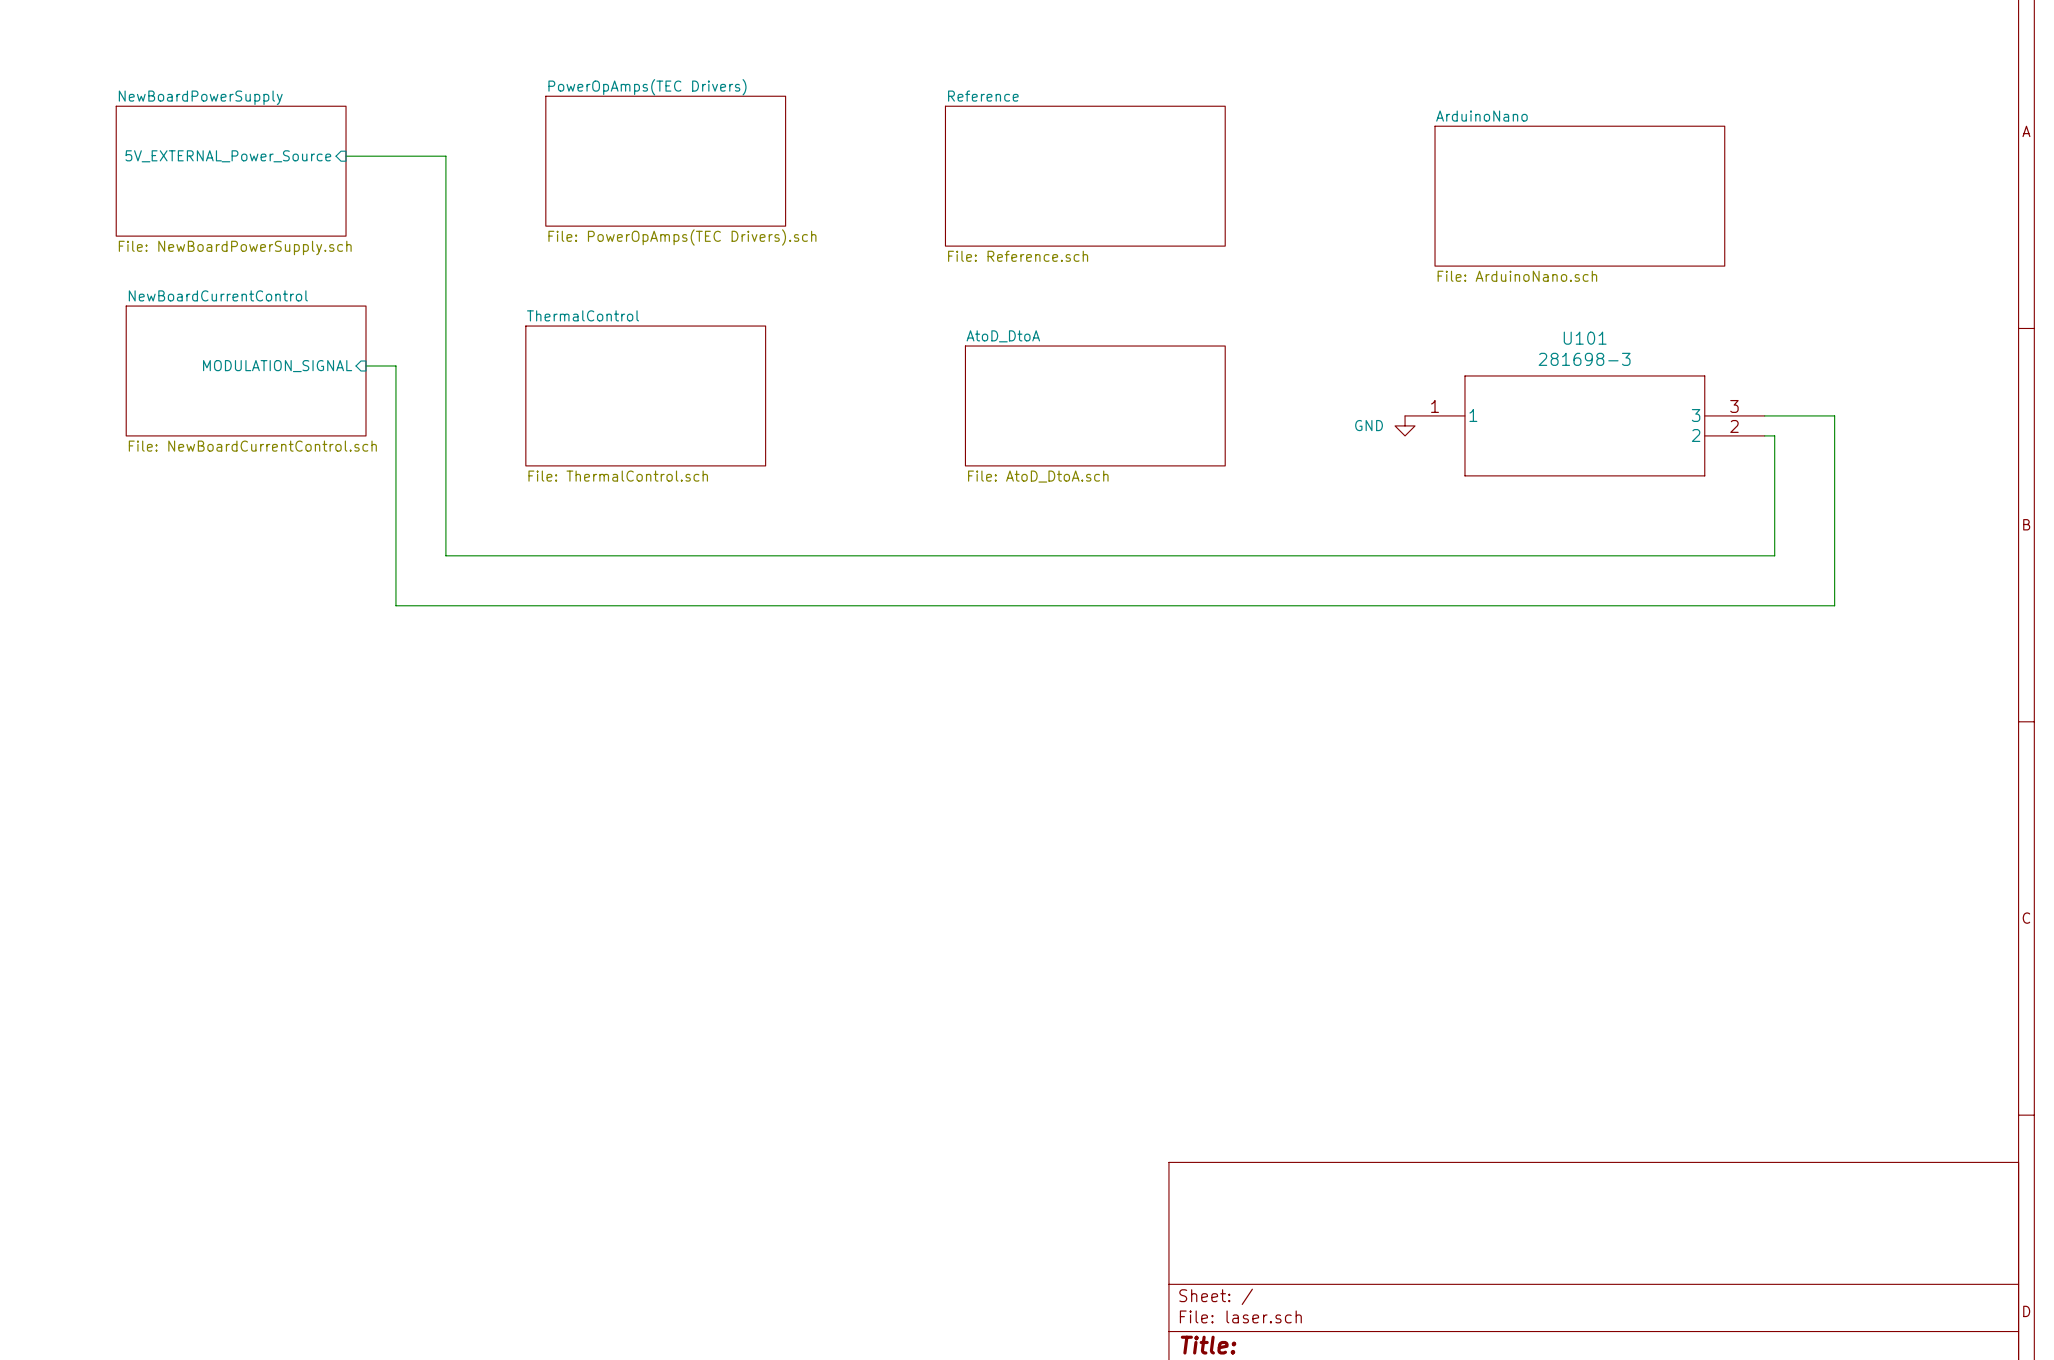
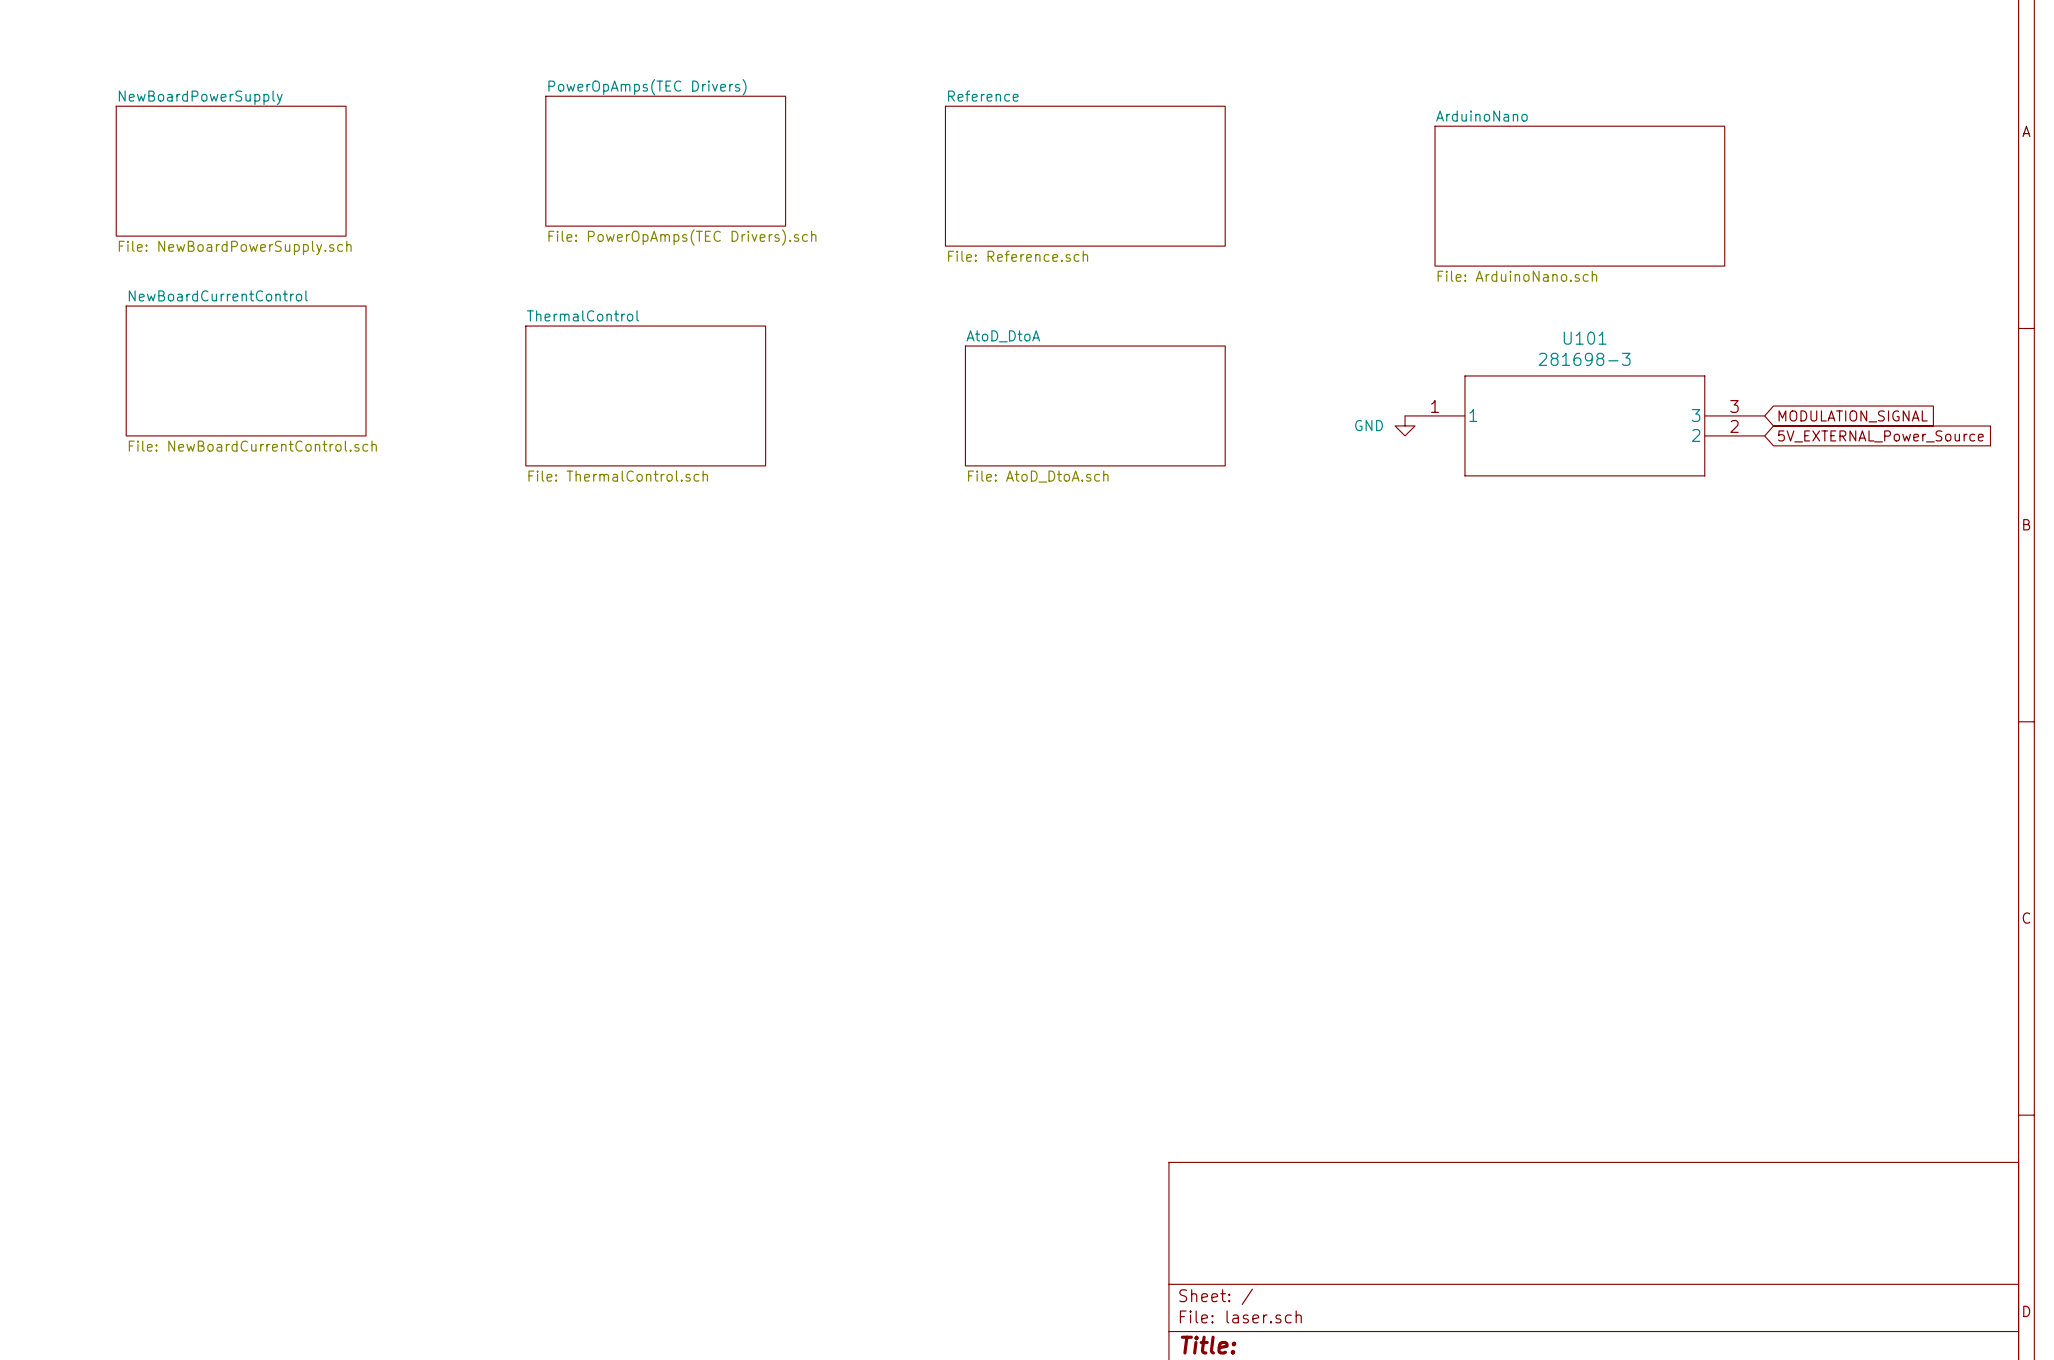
sheet pin: 5V_EXTERNAL_Power_Source (228, 156) -> none
wire: (346, 156) (445, 156) (445, 555) (1774, 555) (1774, 435) (1764, 435) -> none
wire: (365, 365) (395, 365) (395, 605) (1834, 605) (1834, 415) (1764, 415) -> none
sheet pin: MODULATION_SIGNAL (277, 366) -> none
global label: none -> MODULATION_SIGNAL (1853, 416)
global label: none -> 5V_EXTERNAL_Power_Source (1880, 436)

